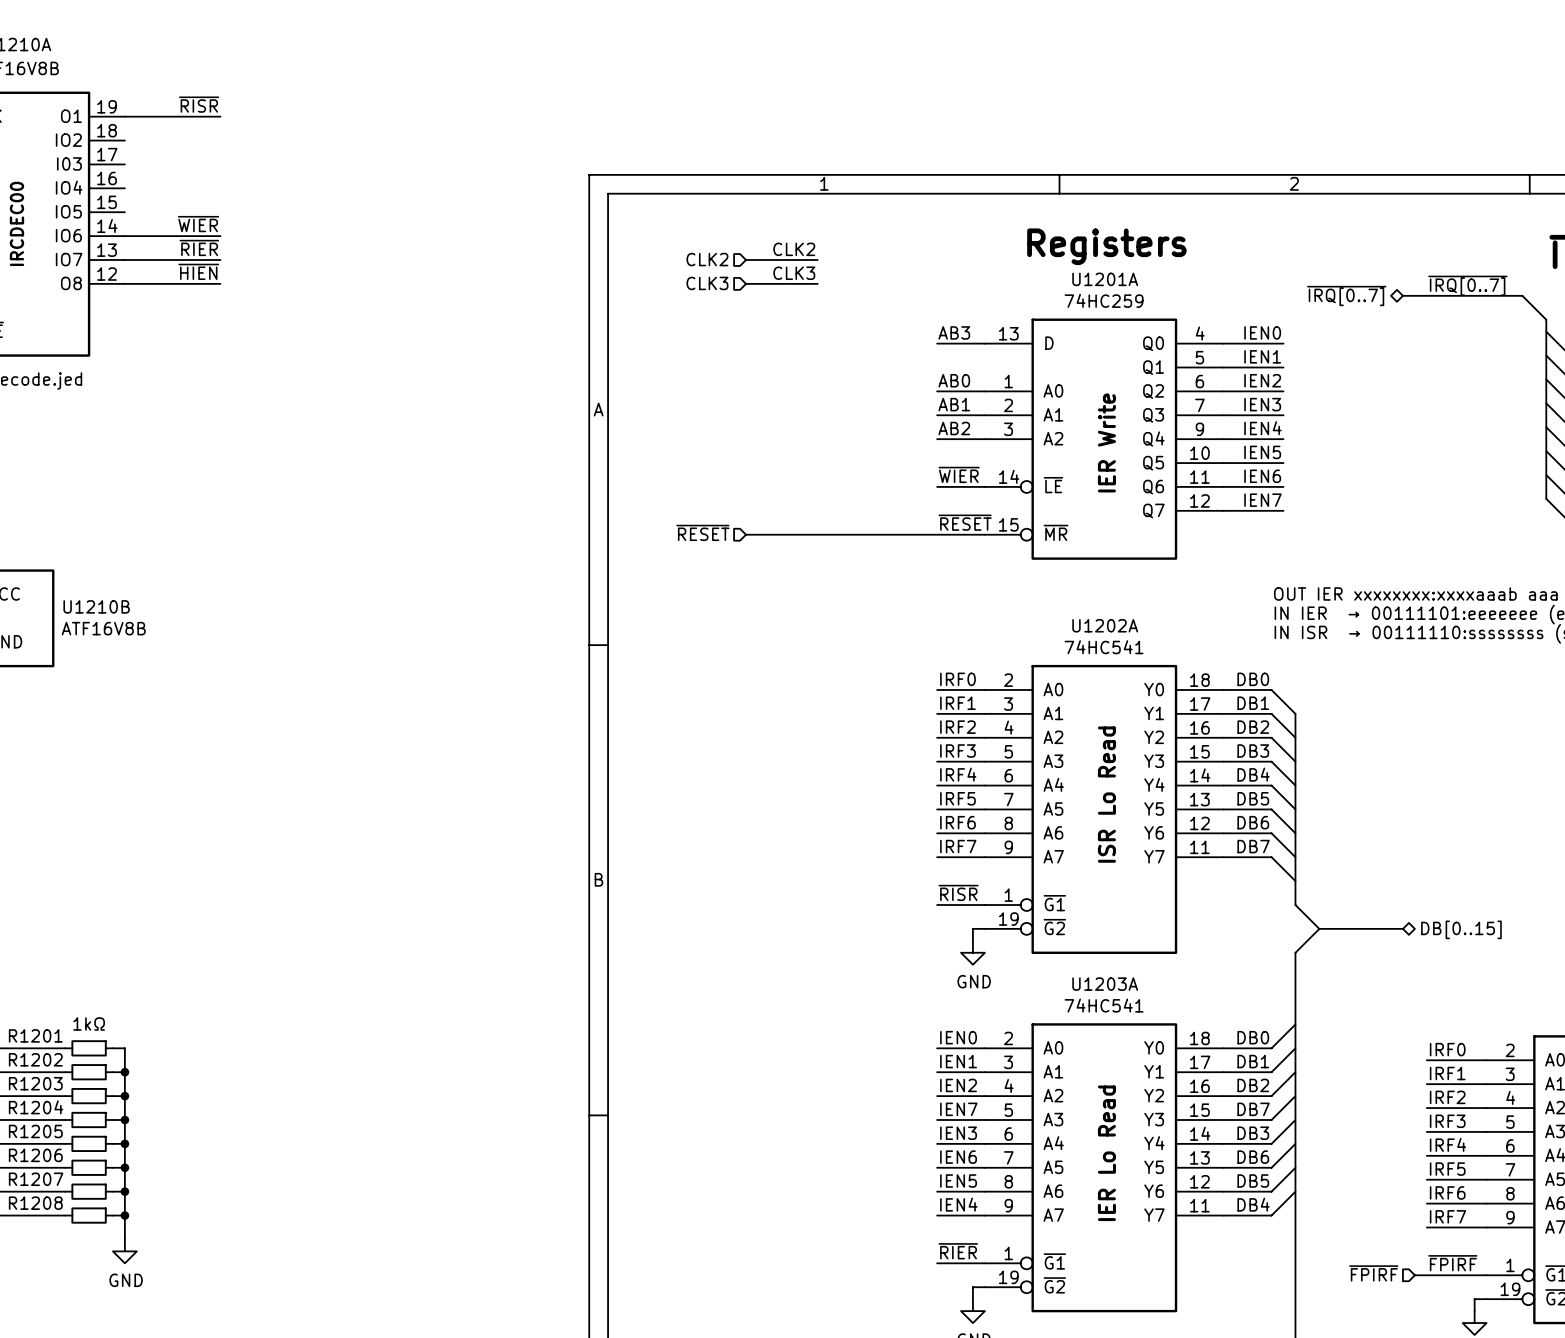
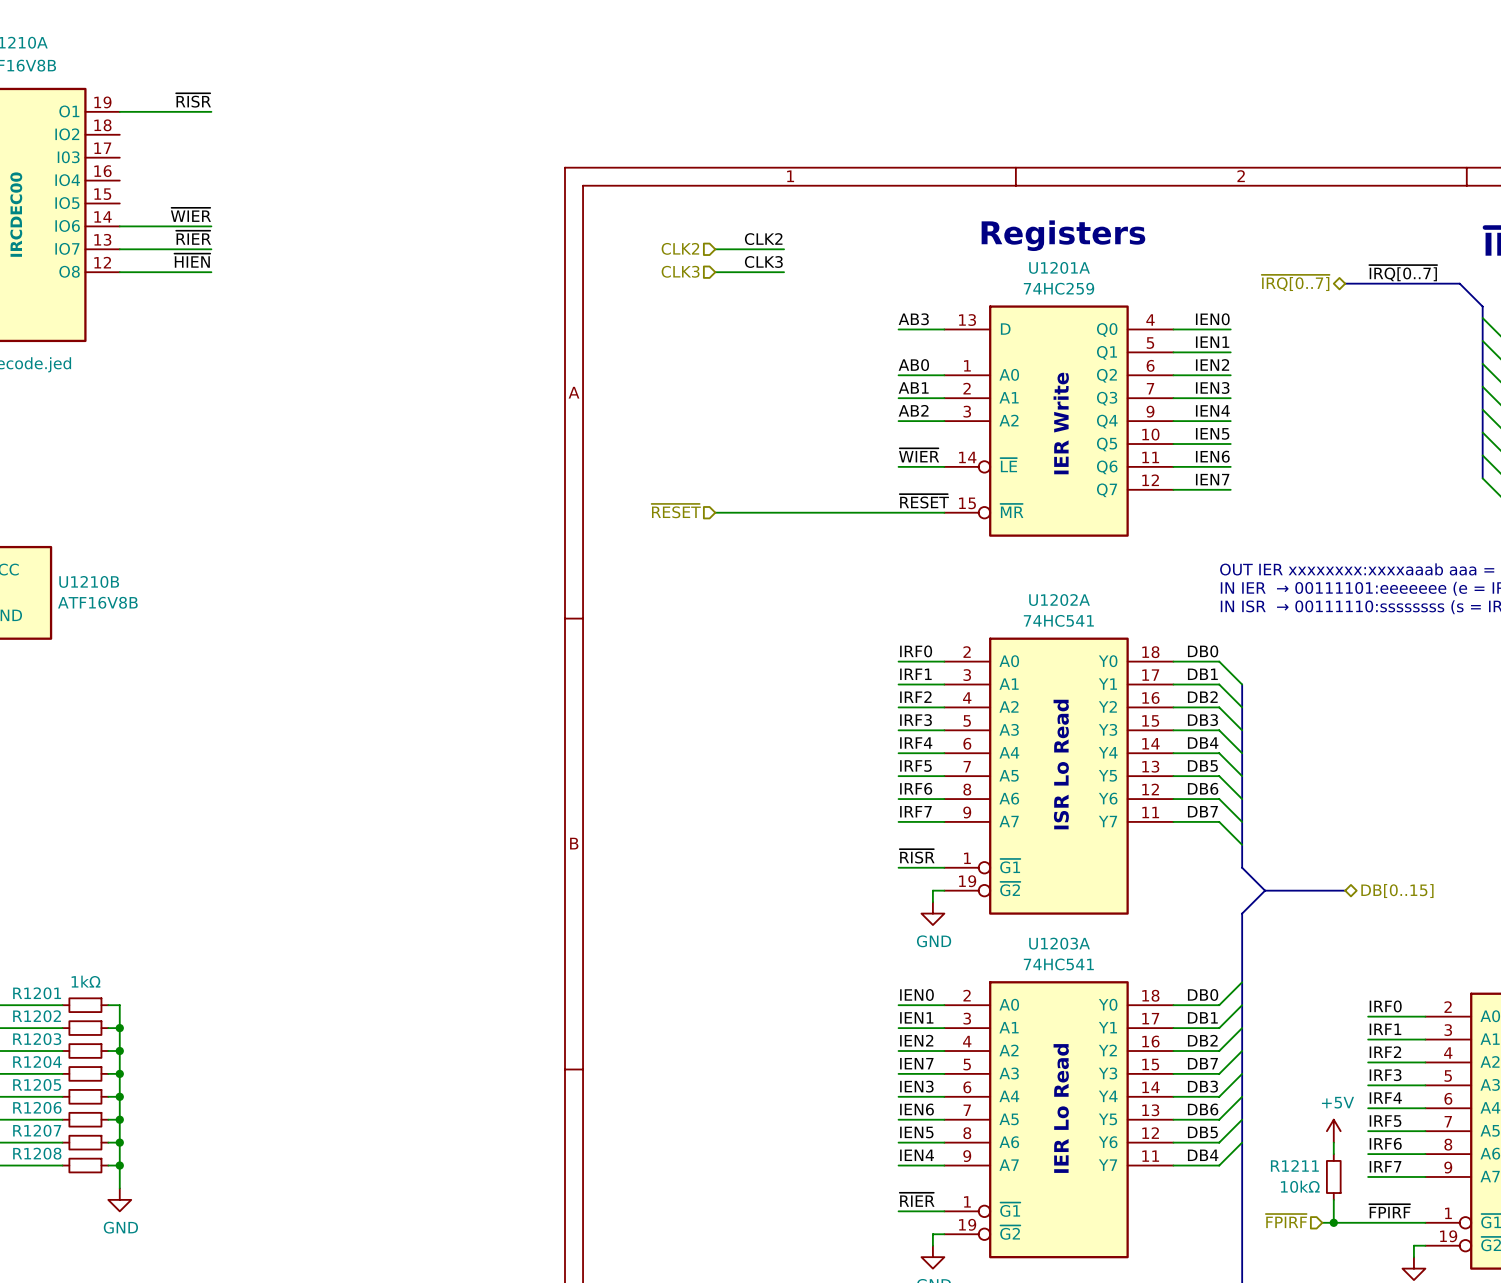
power symbol: none -> +5V (1333, 1131)
wire: none -> (1333, 1142) (1333, 1154)
R1211: none -> 10kΩ (1333, 1176)
wire: none -> (1333, 1199) (1333, 1222)
hierarchical label position: ~{FPIRF} (1373, 1273) -> ~{FPIRF} (1286, 1221)
wire: none -> (1322, 1222) (1356, 1222)
junction: none -> (1333, 1222)

